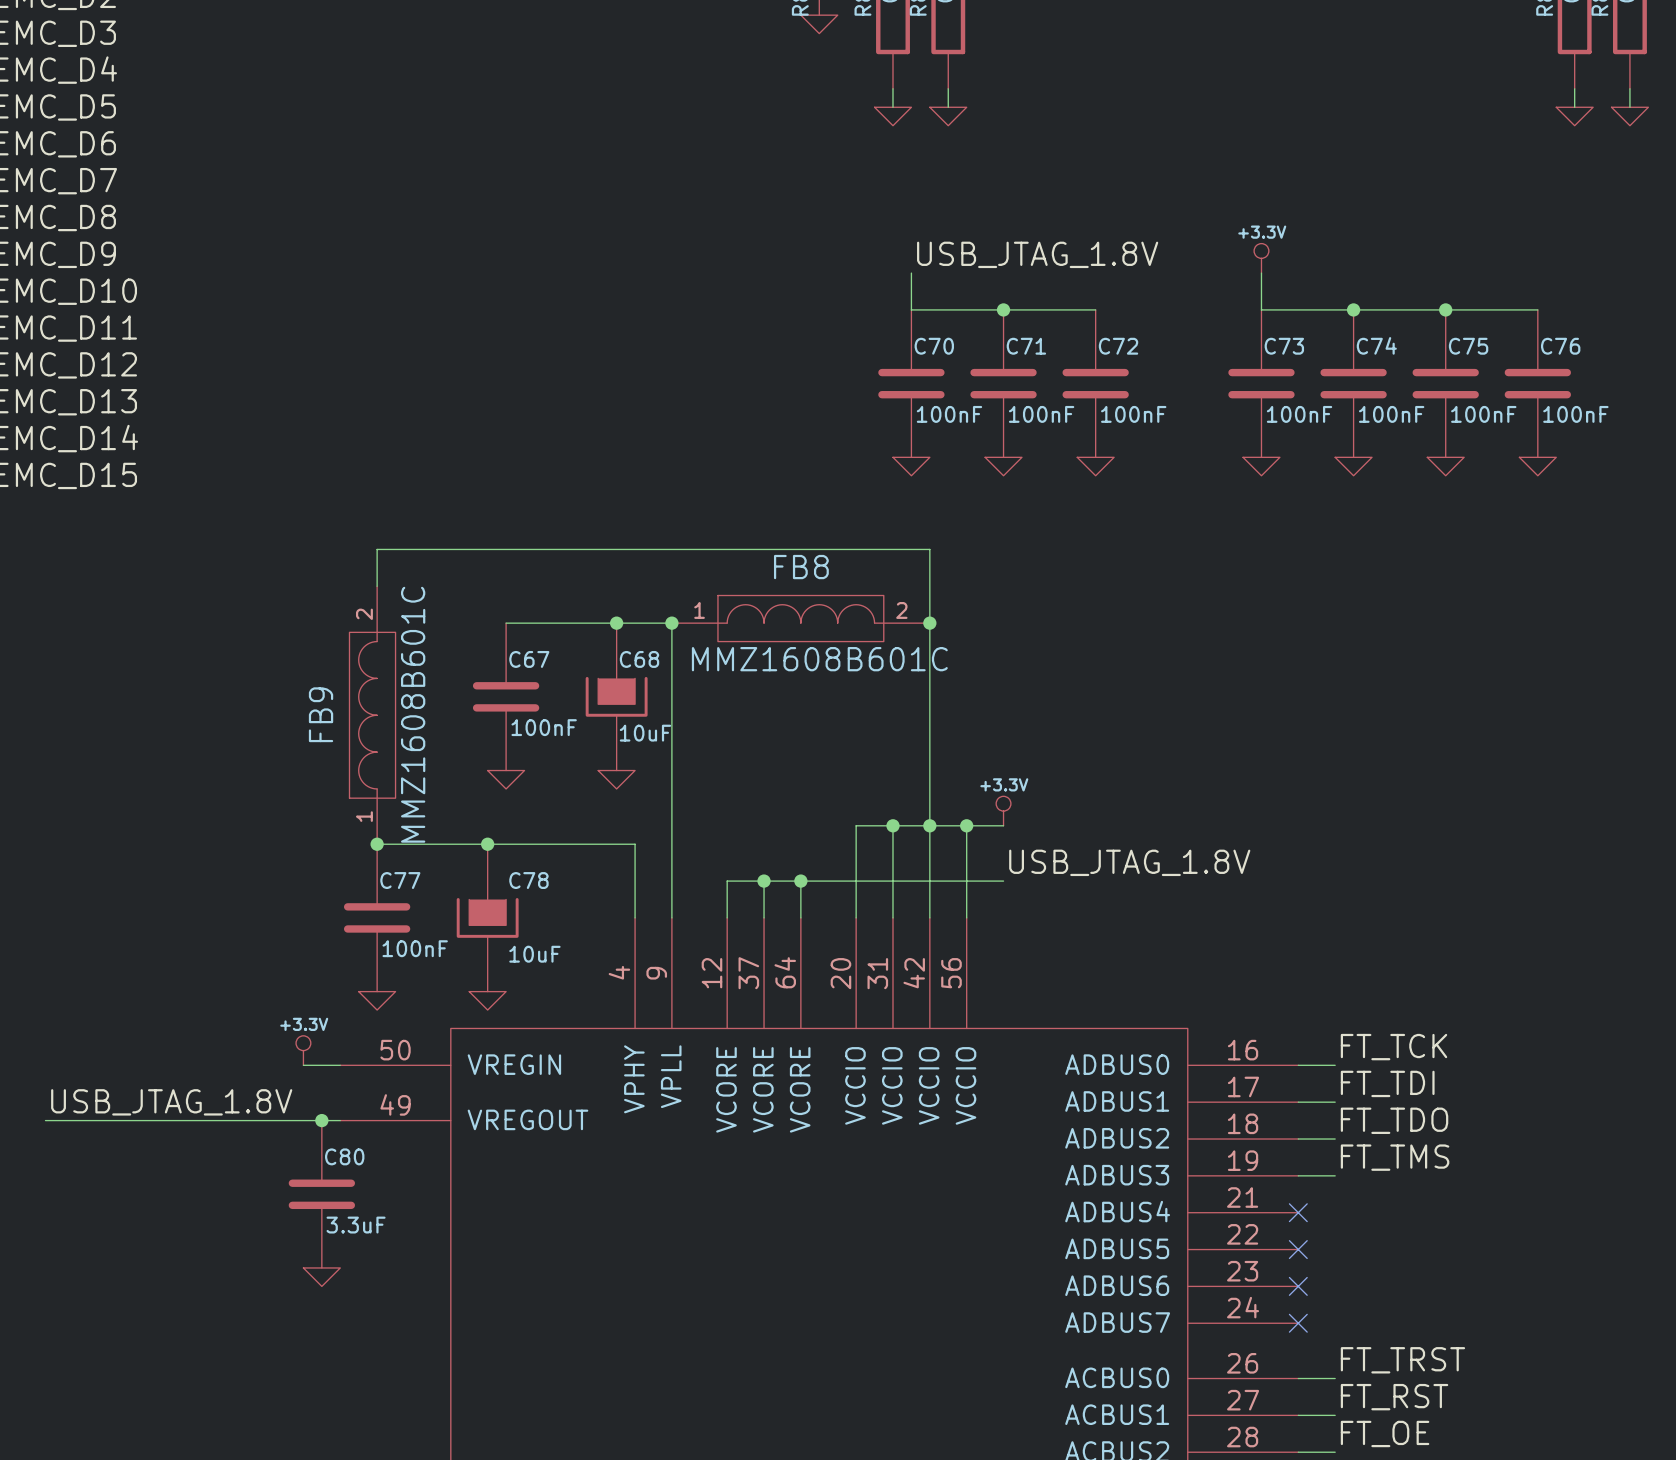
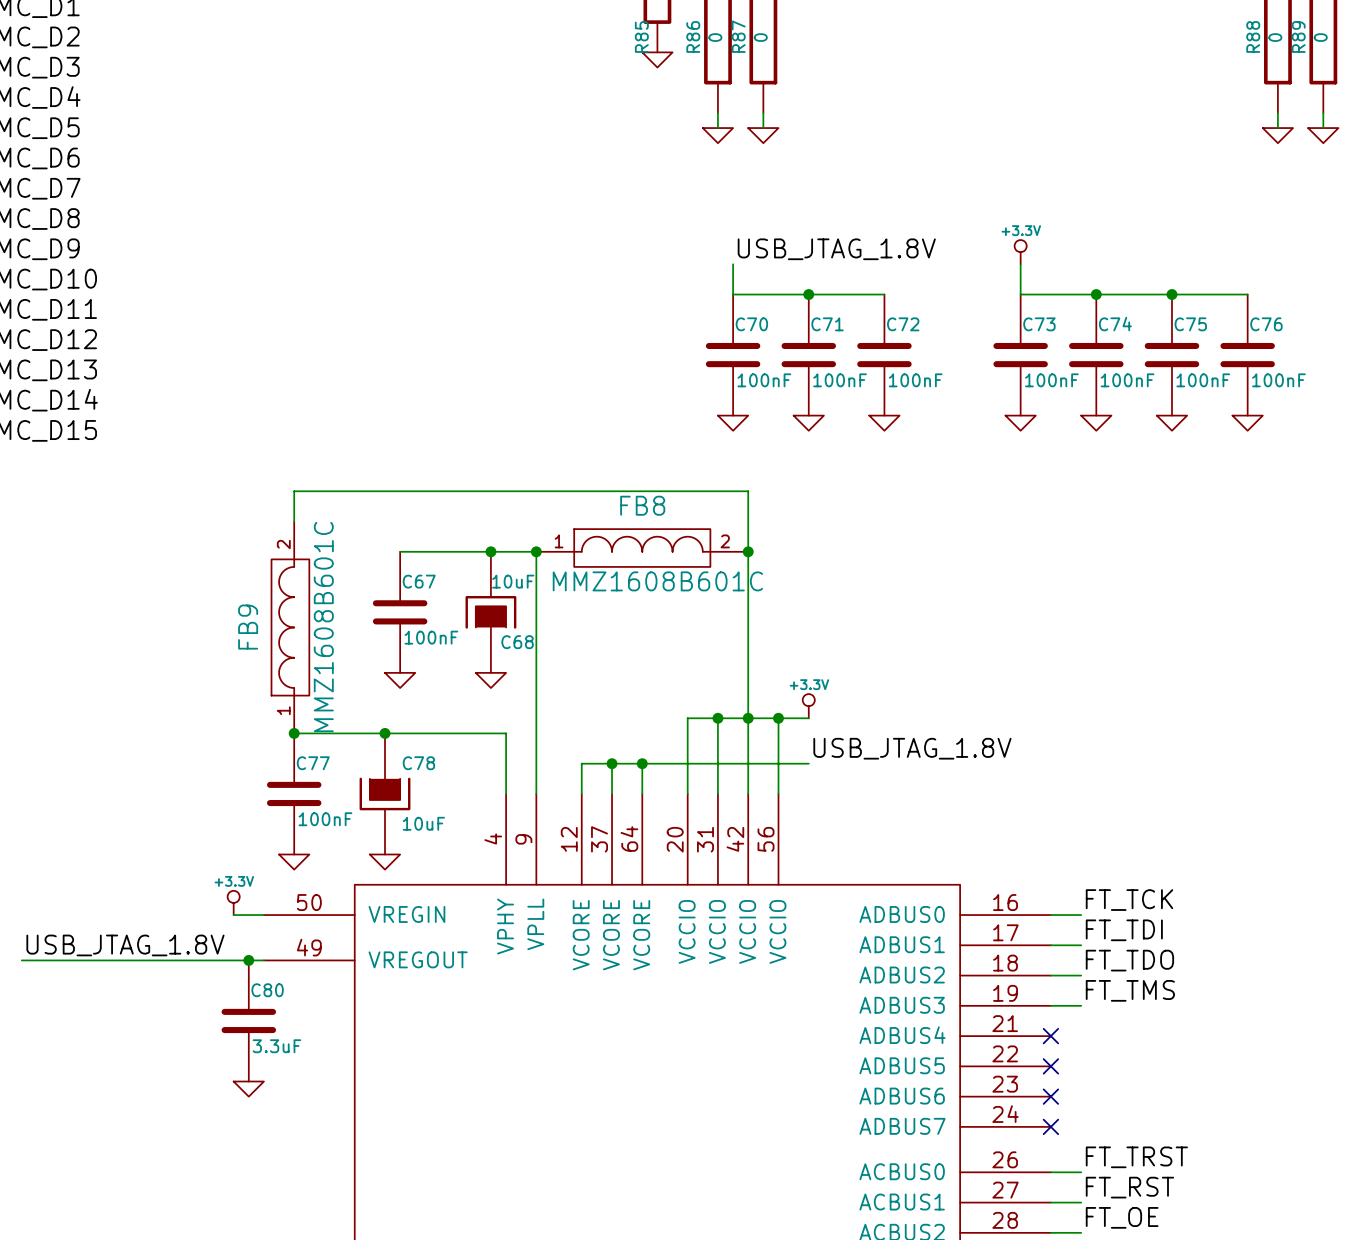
C68 name position: C68 (639, 659) -> C68 (517, 642)
C68 rotation: 0° (616, 696) -> 180° (490, 612)
C68 value position: 10uF (645, 733) -> 10uF (513, 581)

